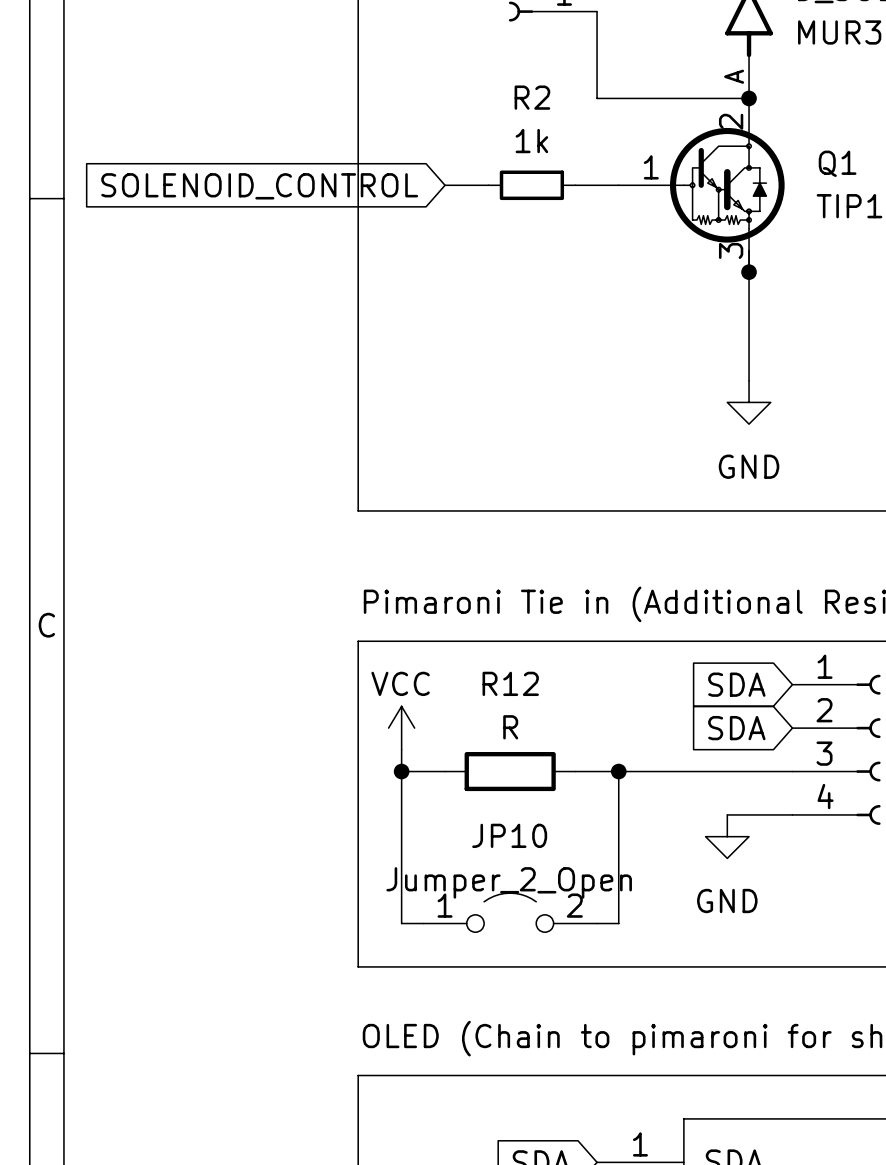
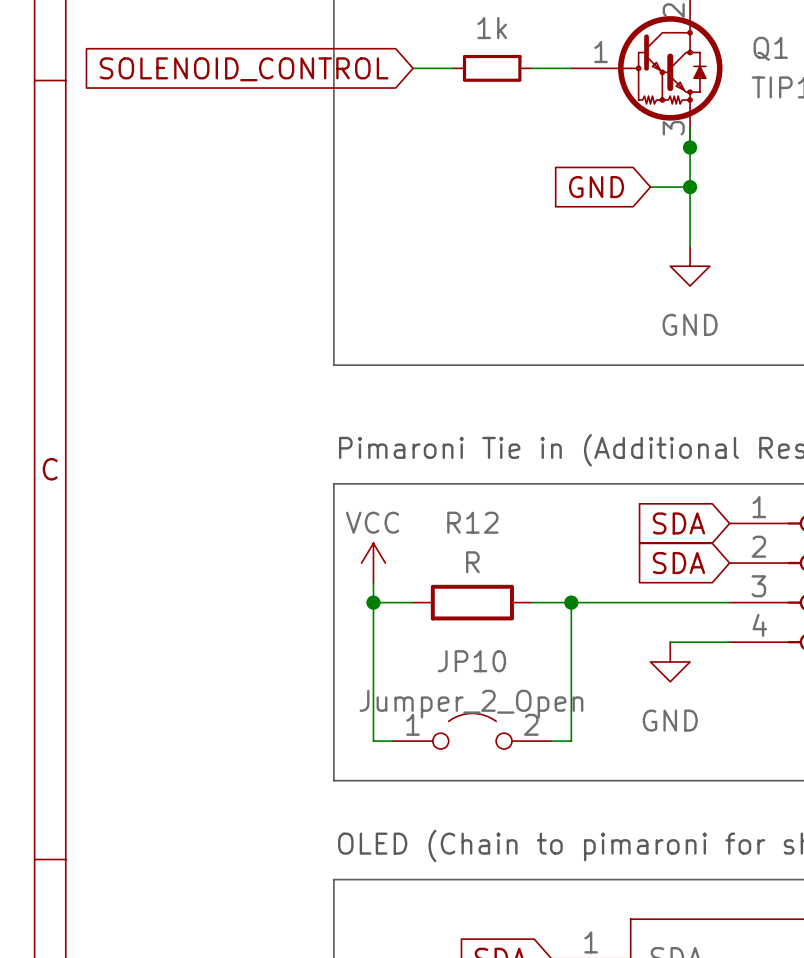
global label: none -> GND (596, 187)
wire: none -> (650, 187) (690, 187)
junction: none -> (690, 187)

